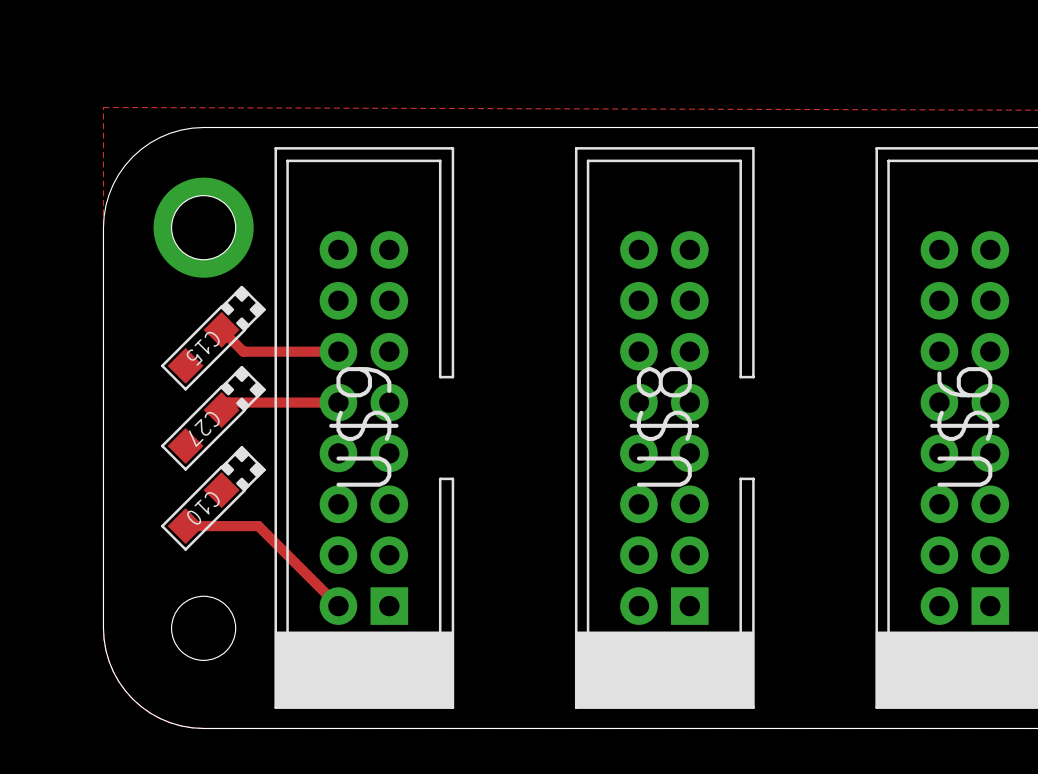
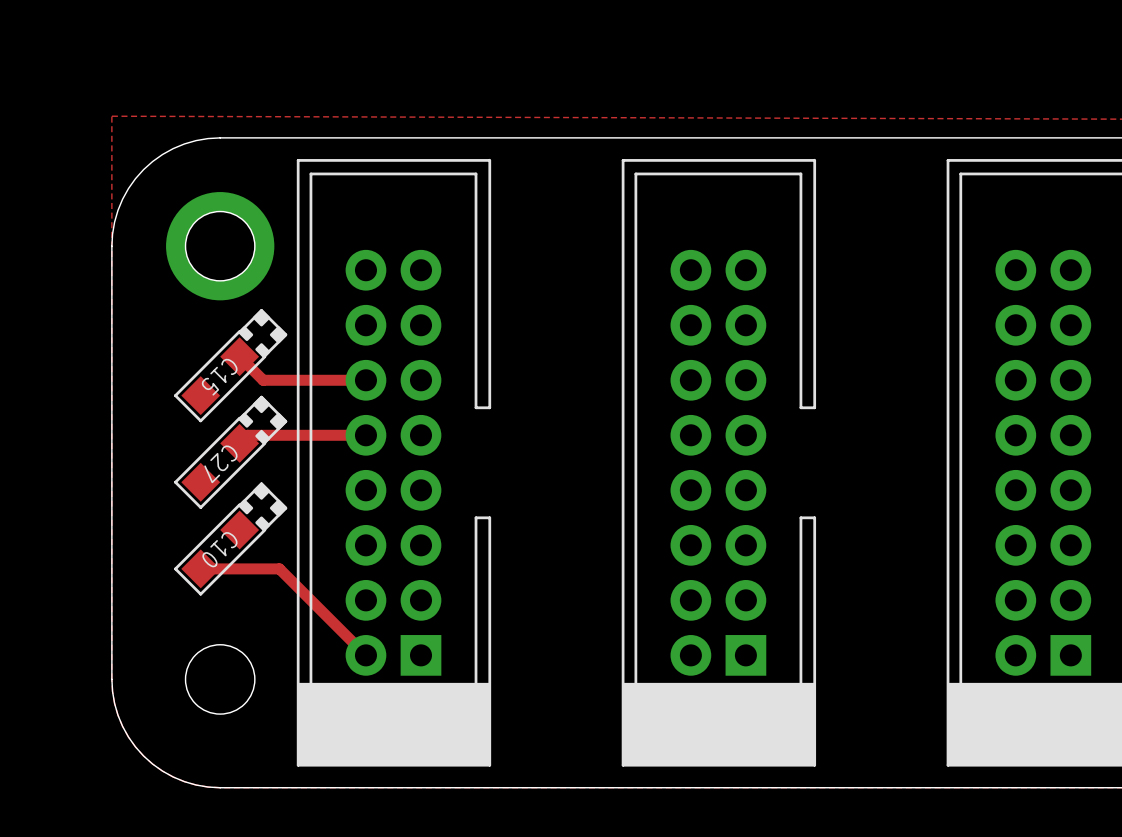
U$9 name: U$9 (363, 426) -> none
U$8 name: U$8 (664, 426) -> none
U$6 name: U$6 (964, 426) -> none

